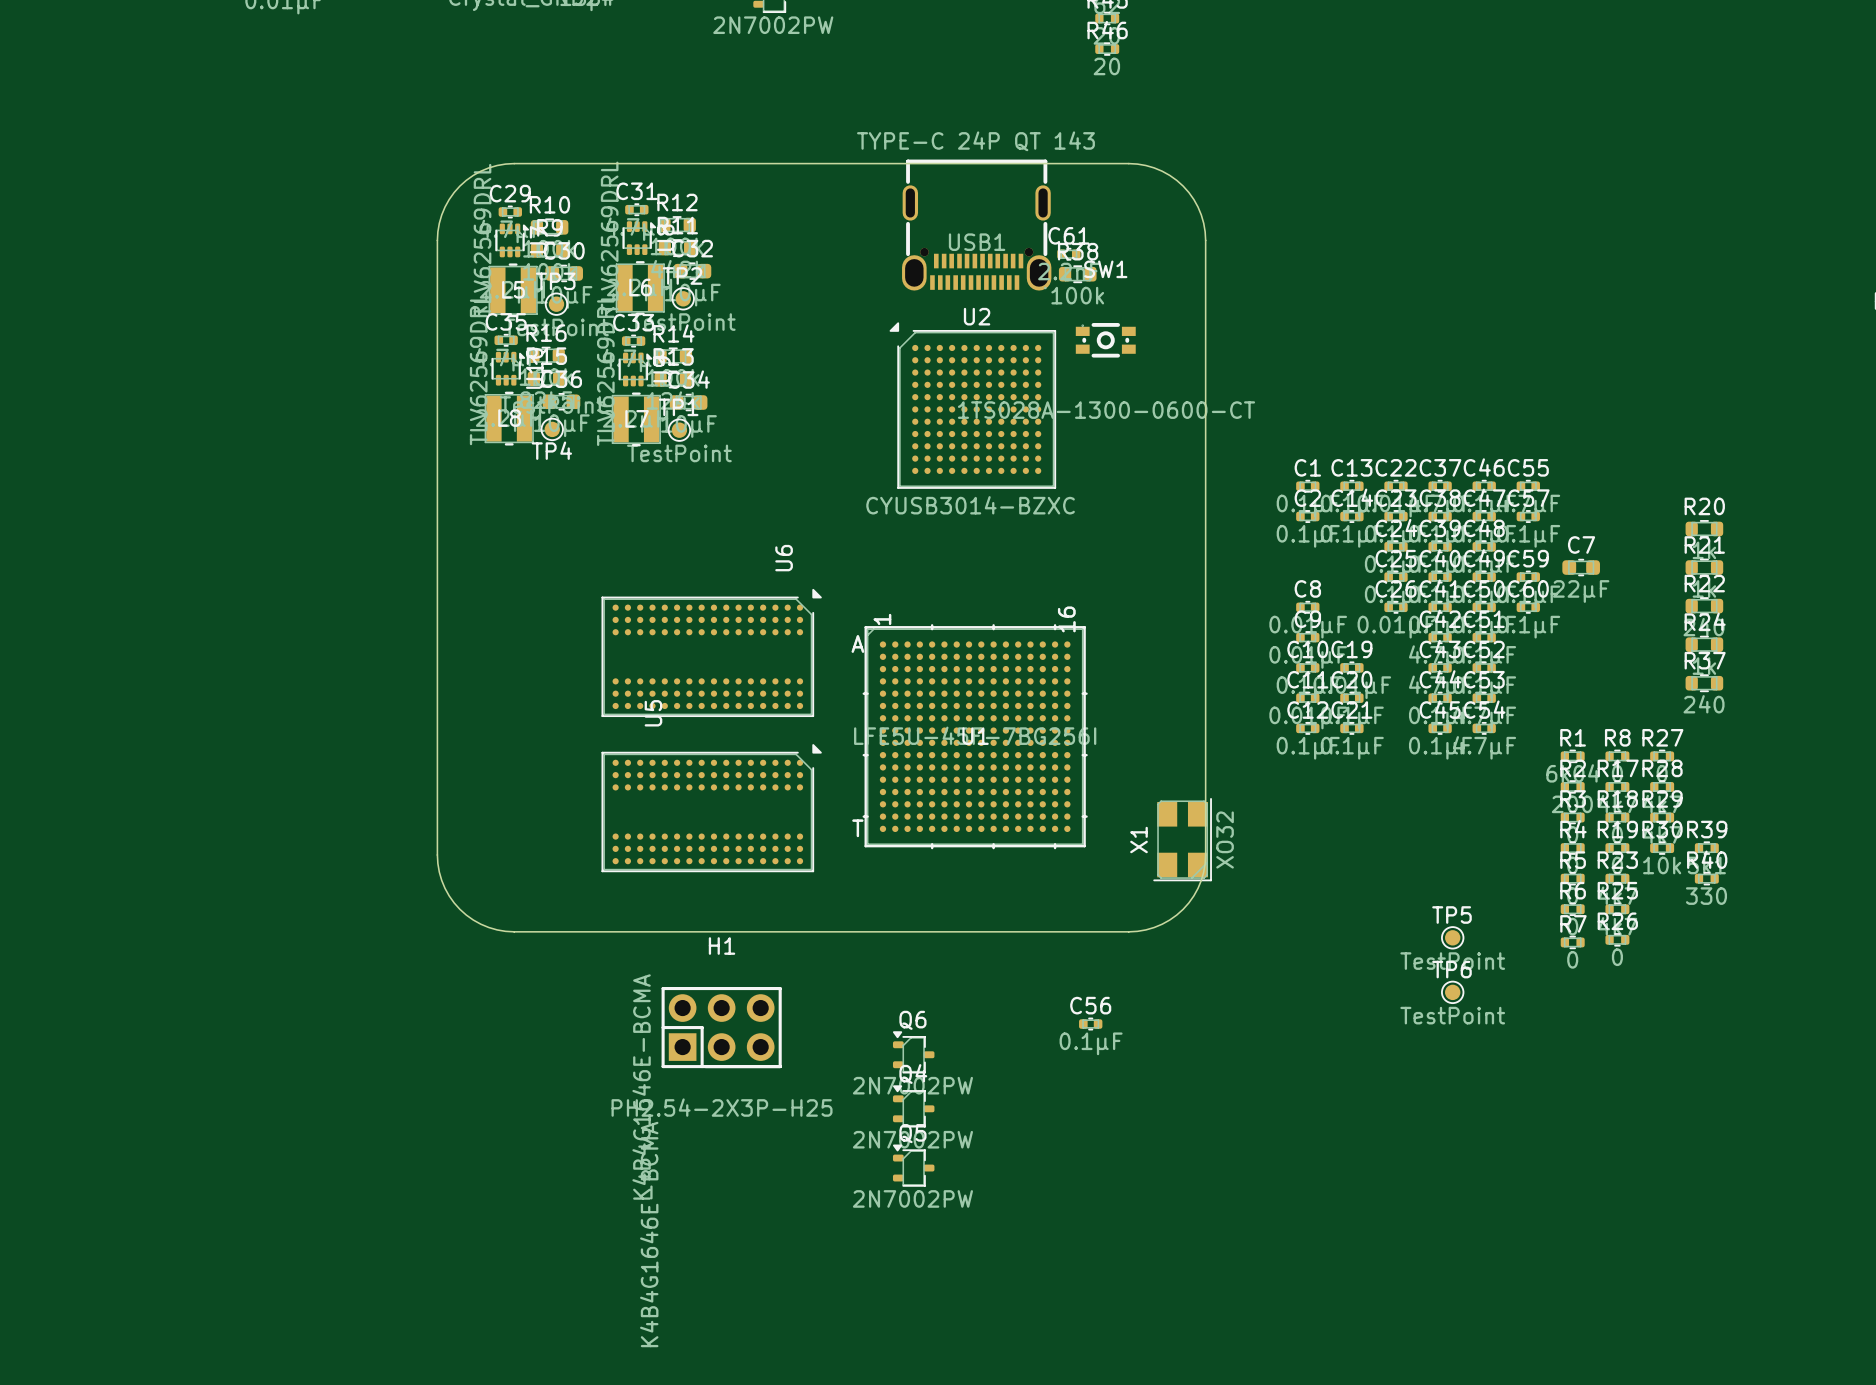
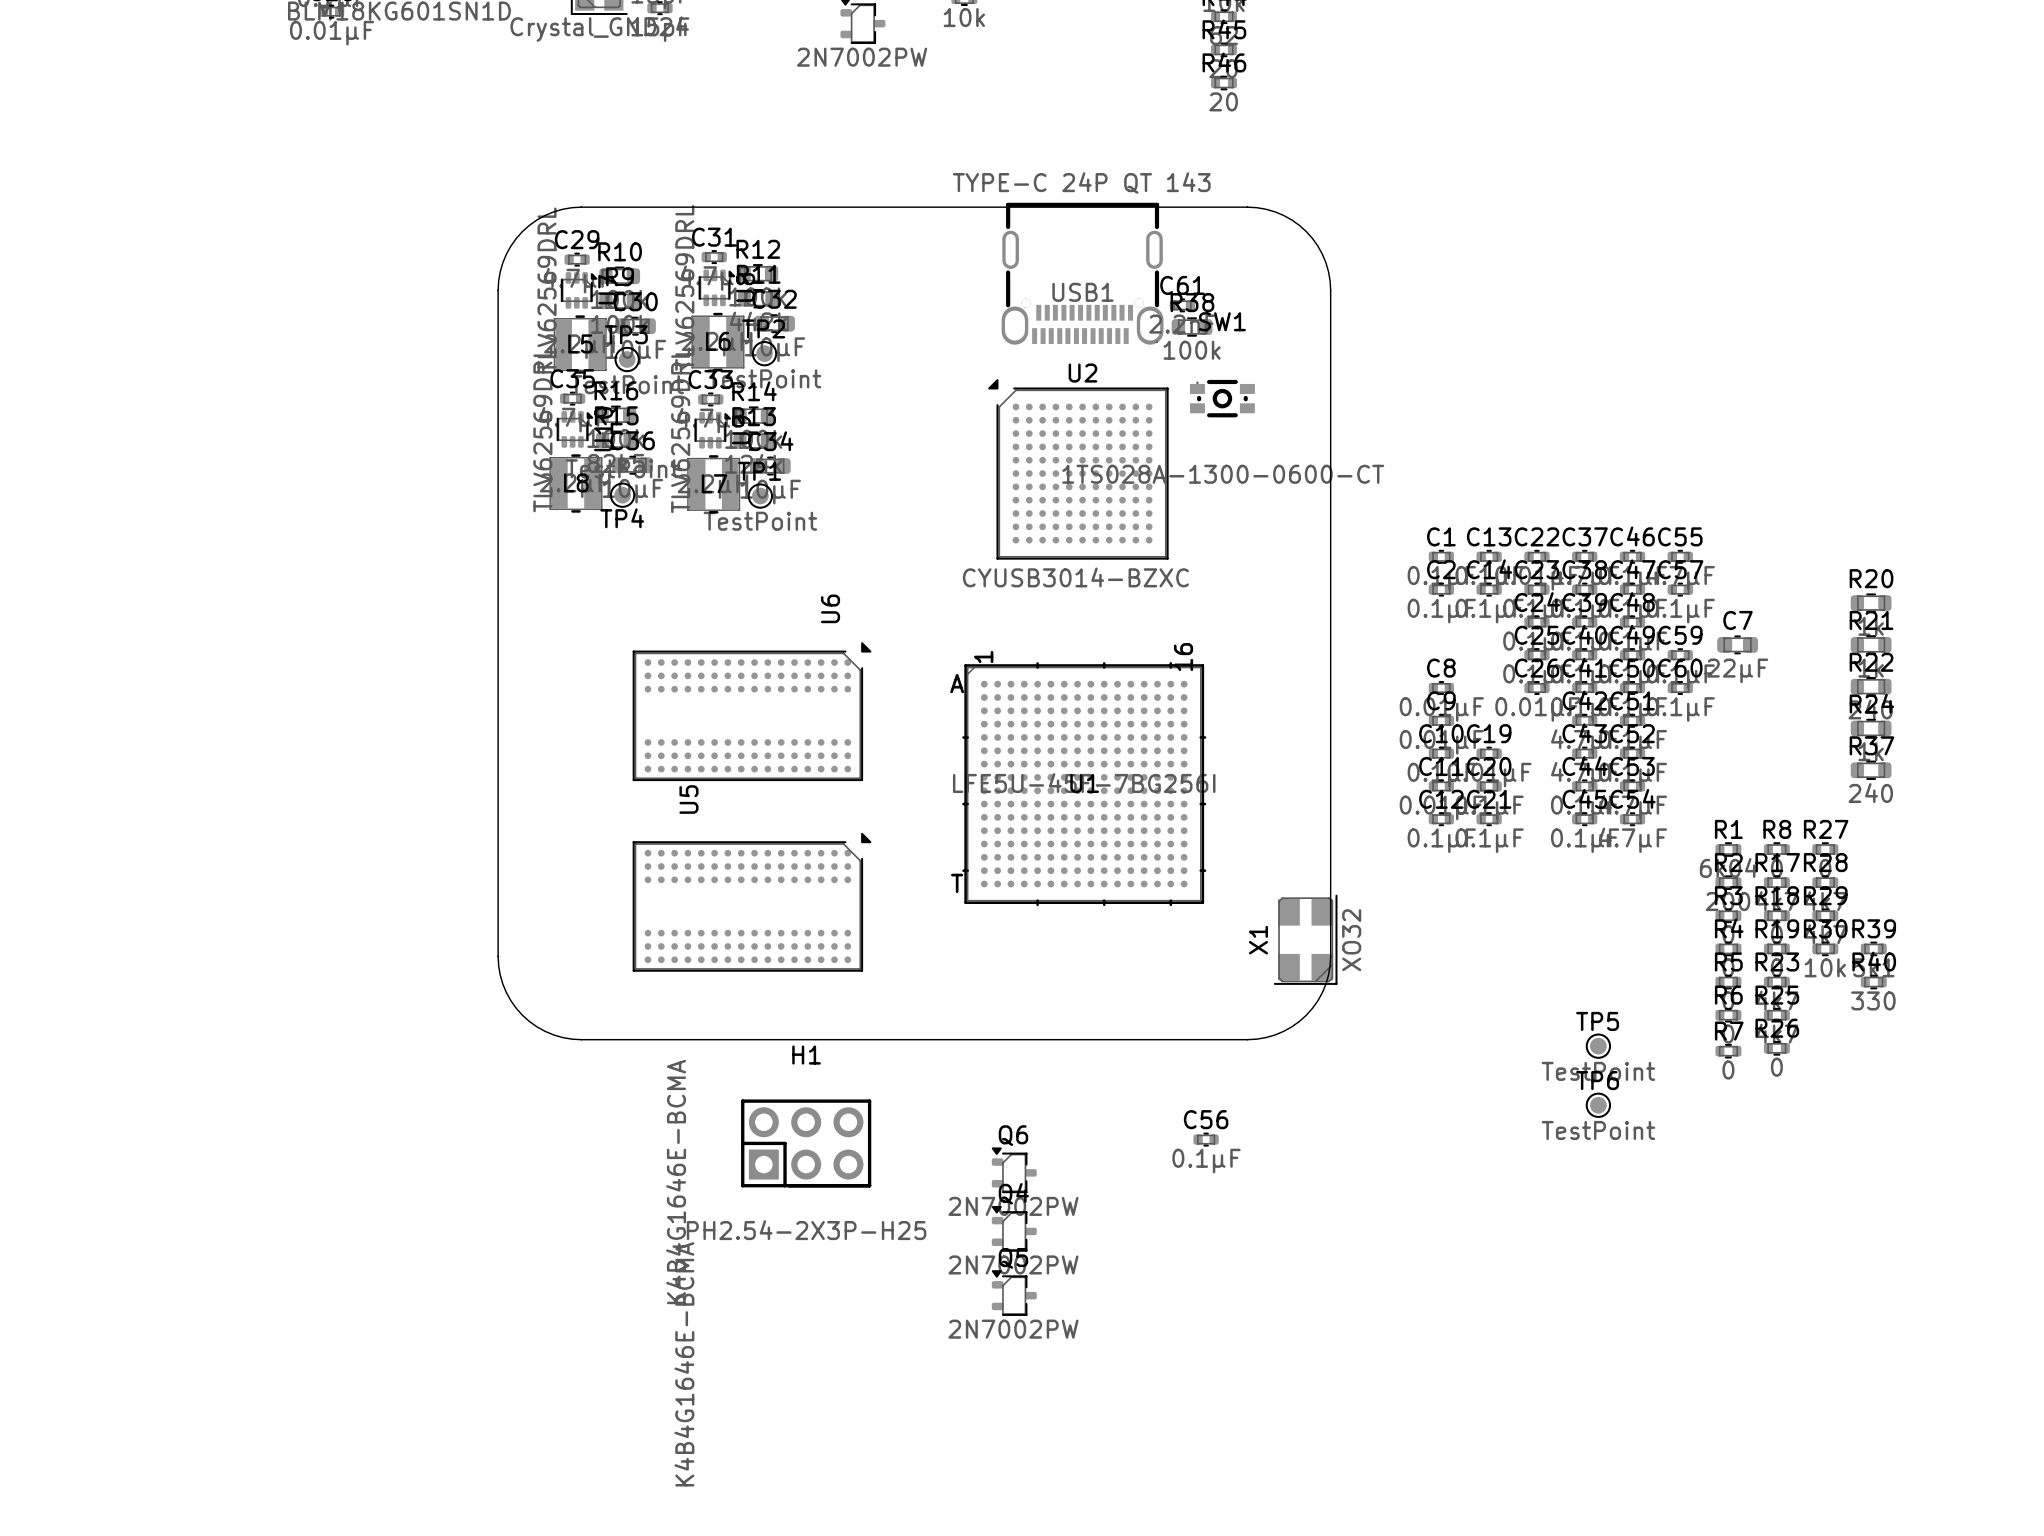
U6 position: (711, 652) -> (752, 711)
U1 position: (975, 736) -> (1084, 784)
U5 position: (711, 808) -> (752, 902)

